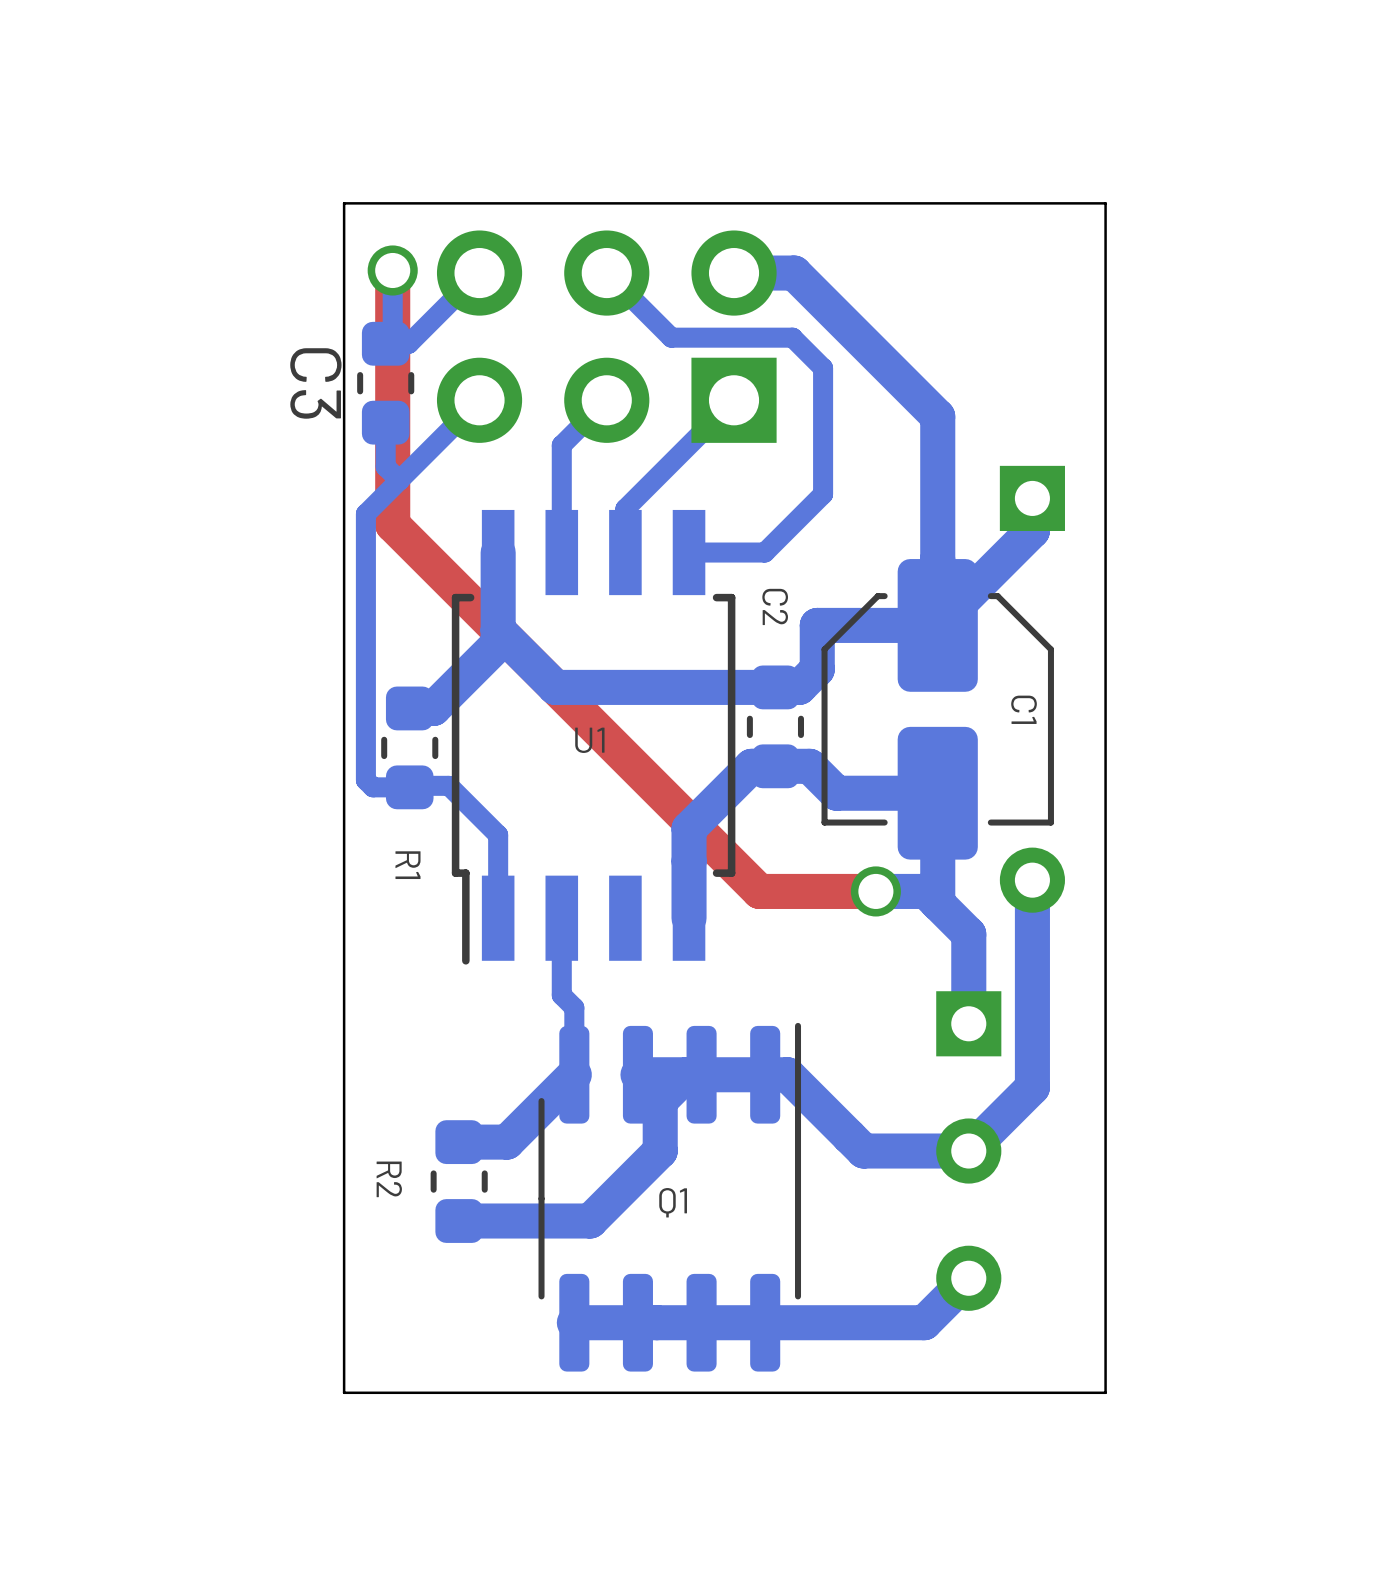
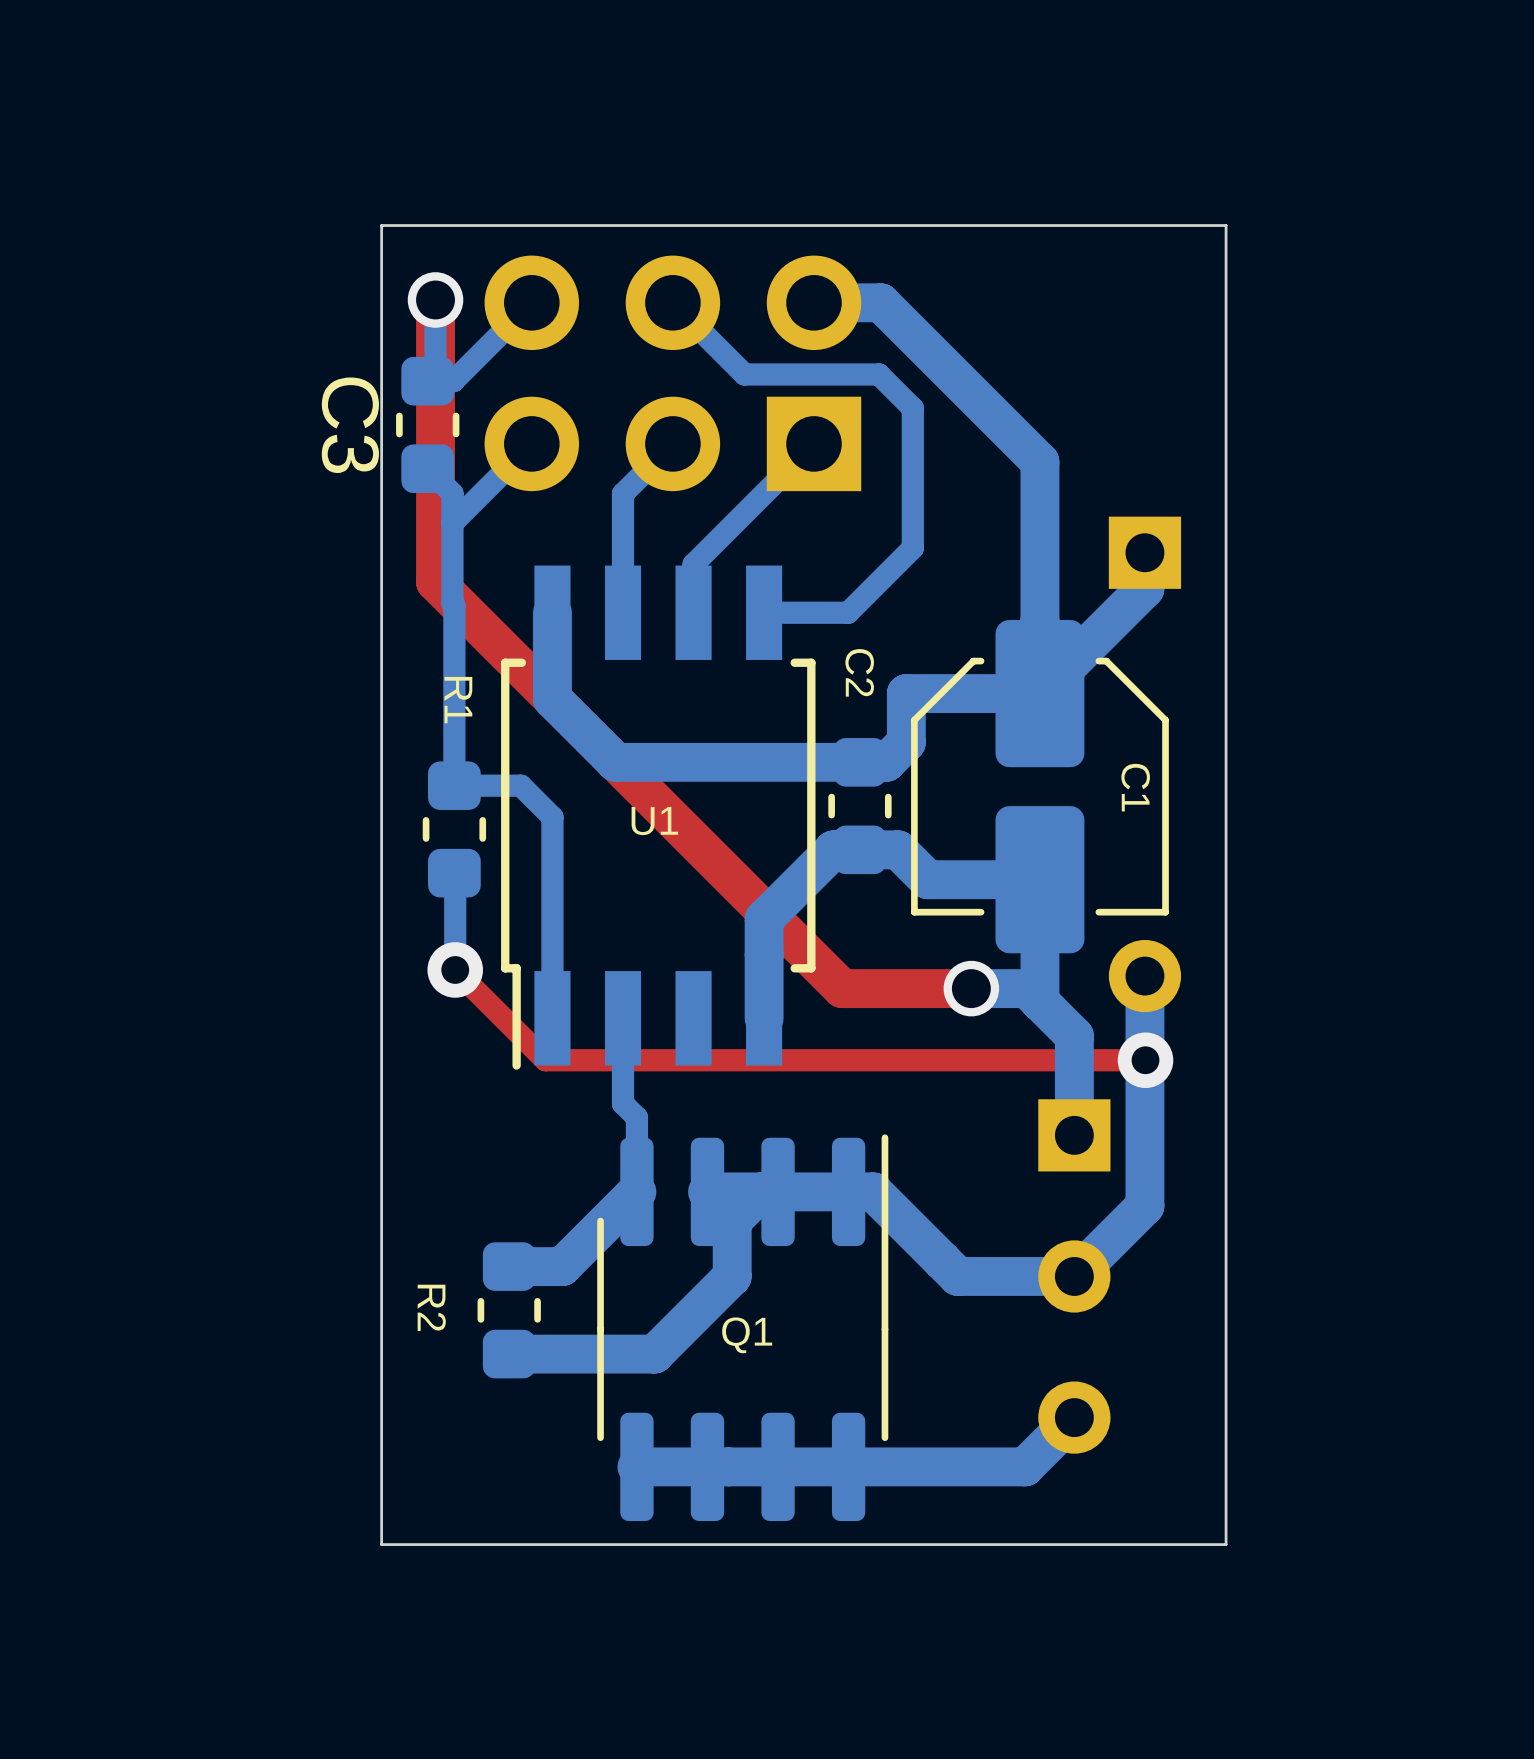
bottom track: (385, 422) (385, 466) (399, 480) -> (427, 468) (452, 493) (454, 785)
bottom track: (407, 471) (365, 513) (365, 780) (373, 787) (409, 787) -> (455, 969) (454, 873)
bottom track: (498, 630) (498, 643) (433, 708) -> none
bottom track: (399, 785) (449, 785) (498, 835) -> (480, 785) (520, 785) (552, 817) (552, 926)
R1 name position: R1 (407, 865) -> R1 (458, 700)
top track: none -> (455, 969) (545, 1060) (1145, 1060)
via: none -> (455, 969)
via: none -> (1145, 1060)

